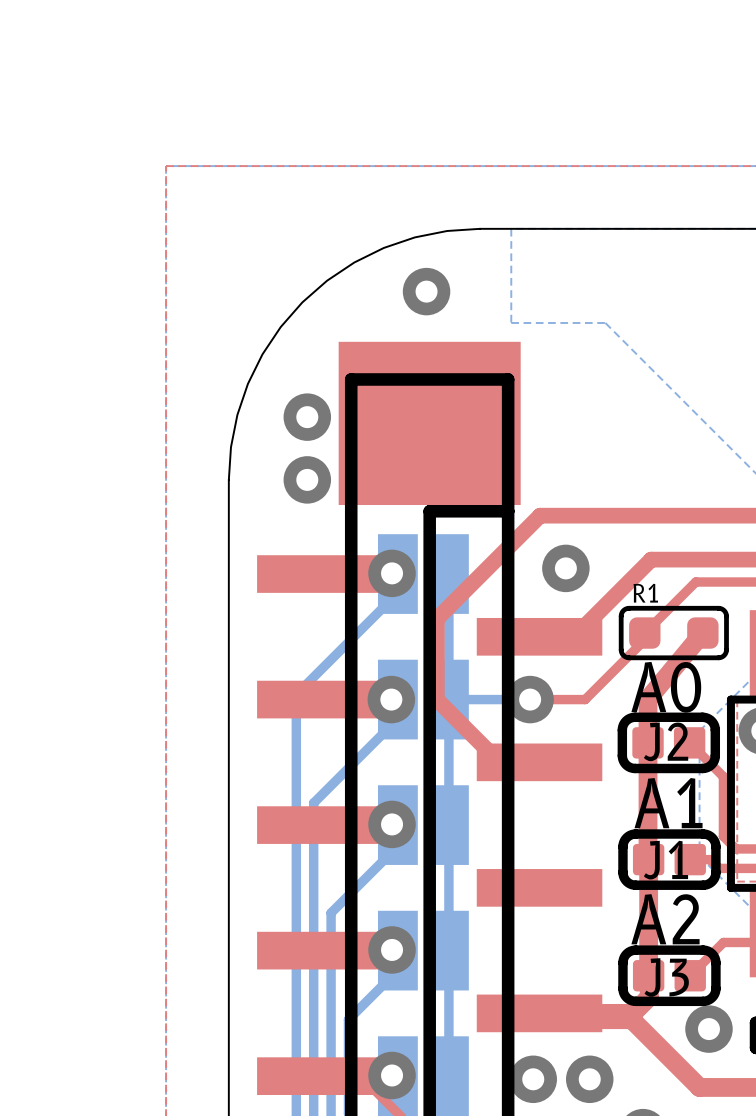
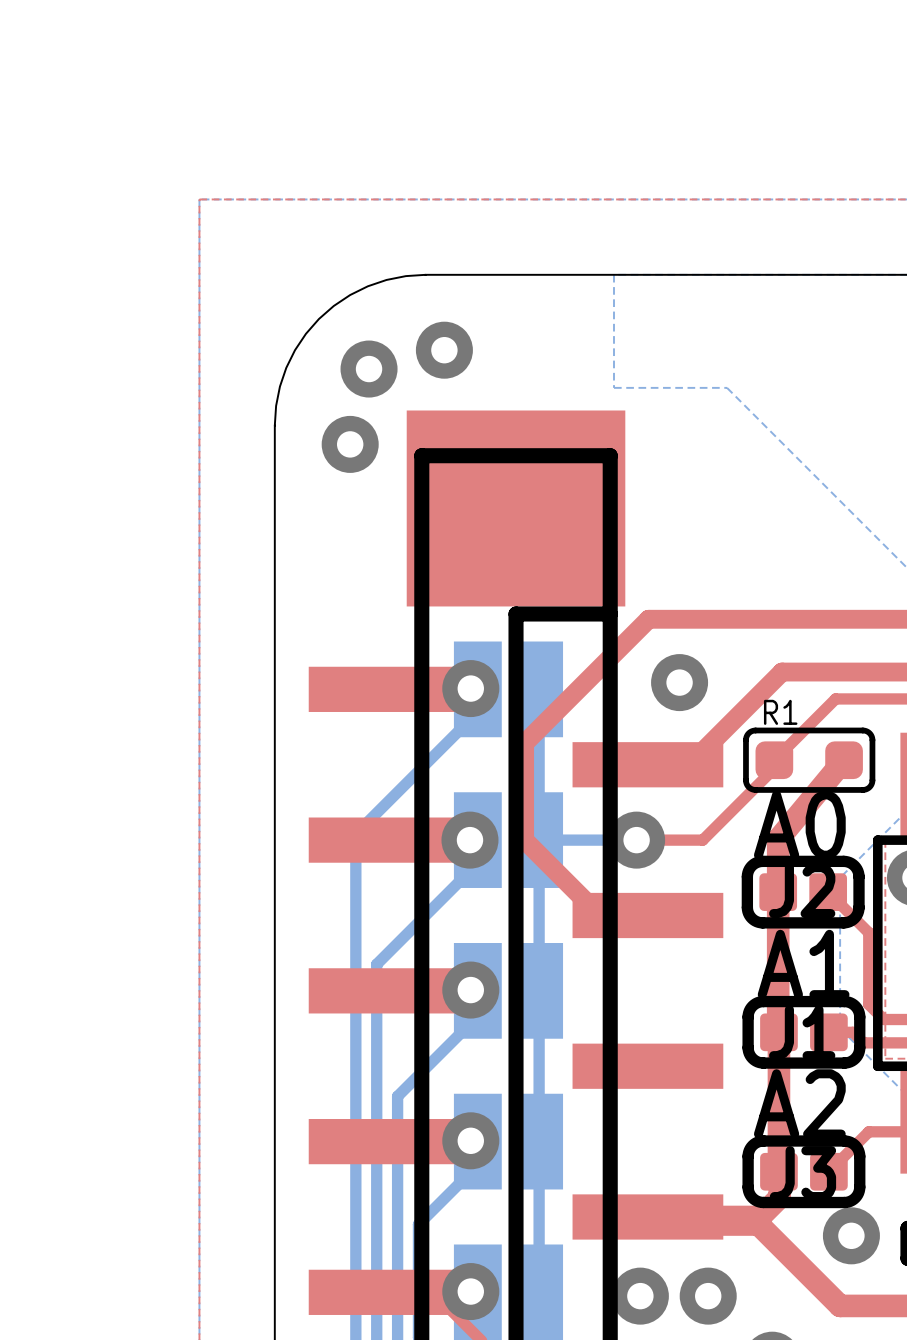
board edge: (479, 228) (447, 230) (414, 237) (383, 247) (354, 262) (327, 280) (302, 302) (280, 327) (262, 354) (247, 383) (237, 414) (230, 447) (228, 479) -> (576, 274) (405, 276) (367, 286) (350, 295) (318, 318) (295, 350) (286, 367) (276, 405) (274, 576)
via position: (426, 291) -> (444, 350)
via: none -> (369, 369)
via position: (307, 417) -> (350, 444)
via: (307, 479) -> none

